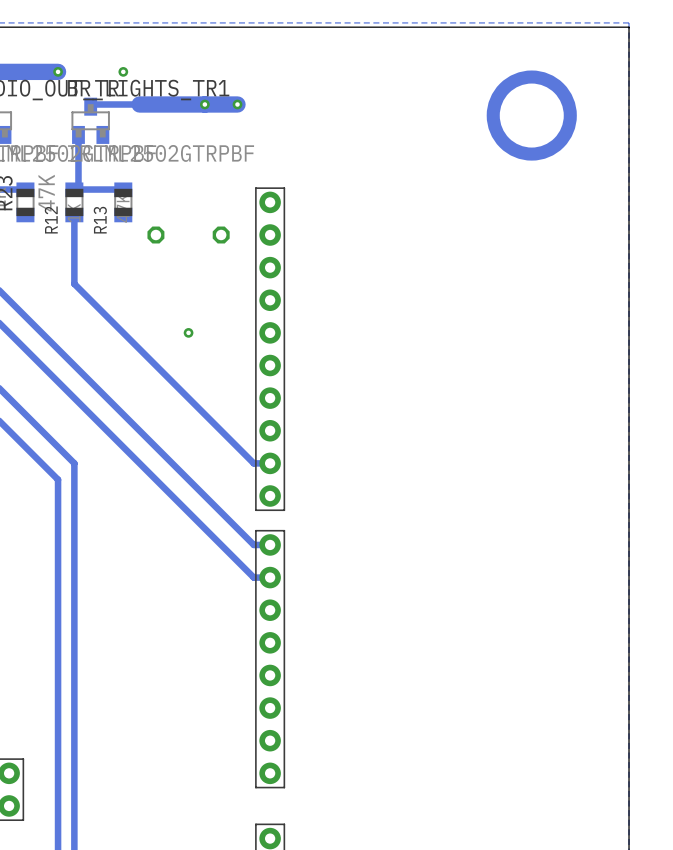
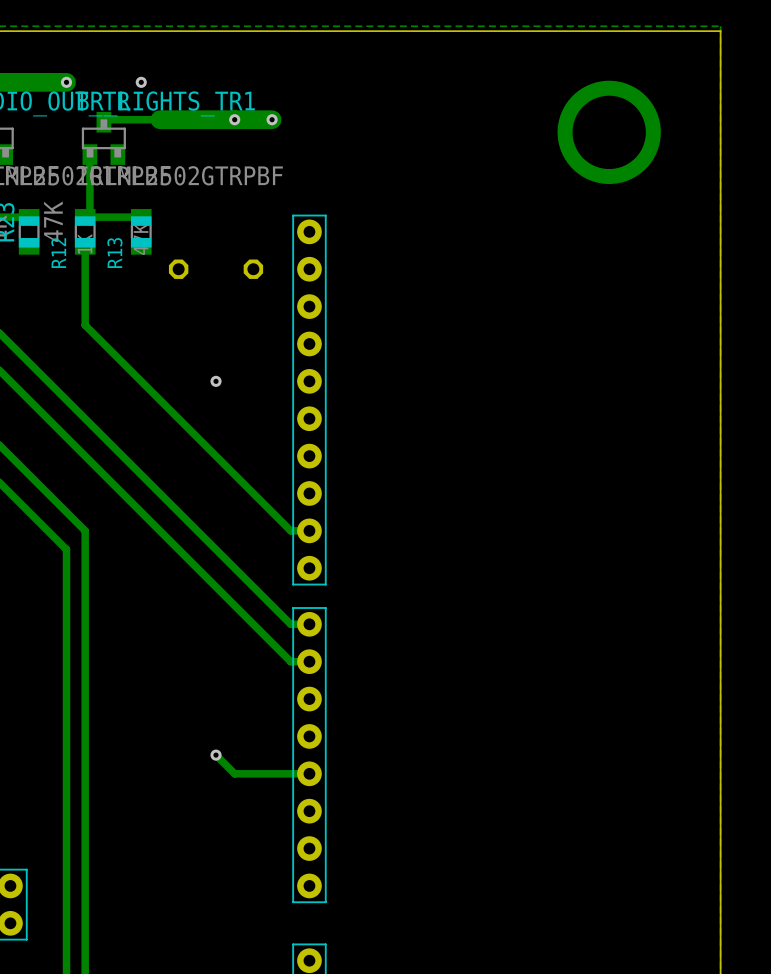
track: none -> (216, 755) (234, 773) (309, 773)
via: none -> (216, 755)

